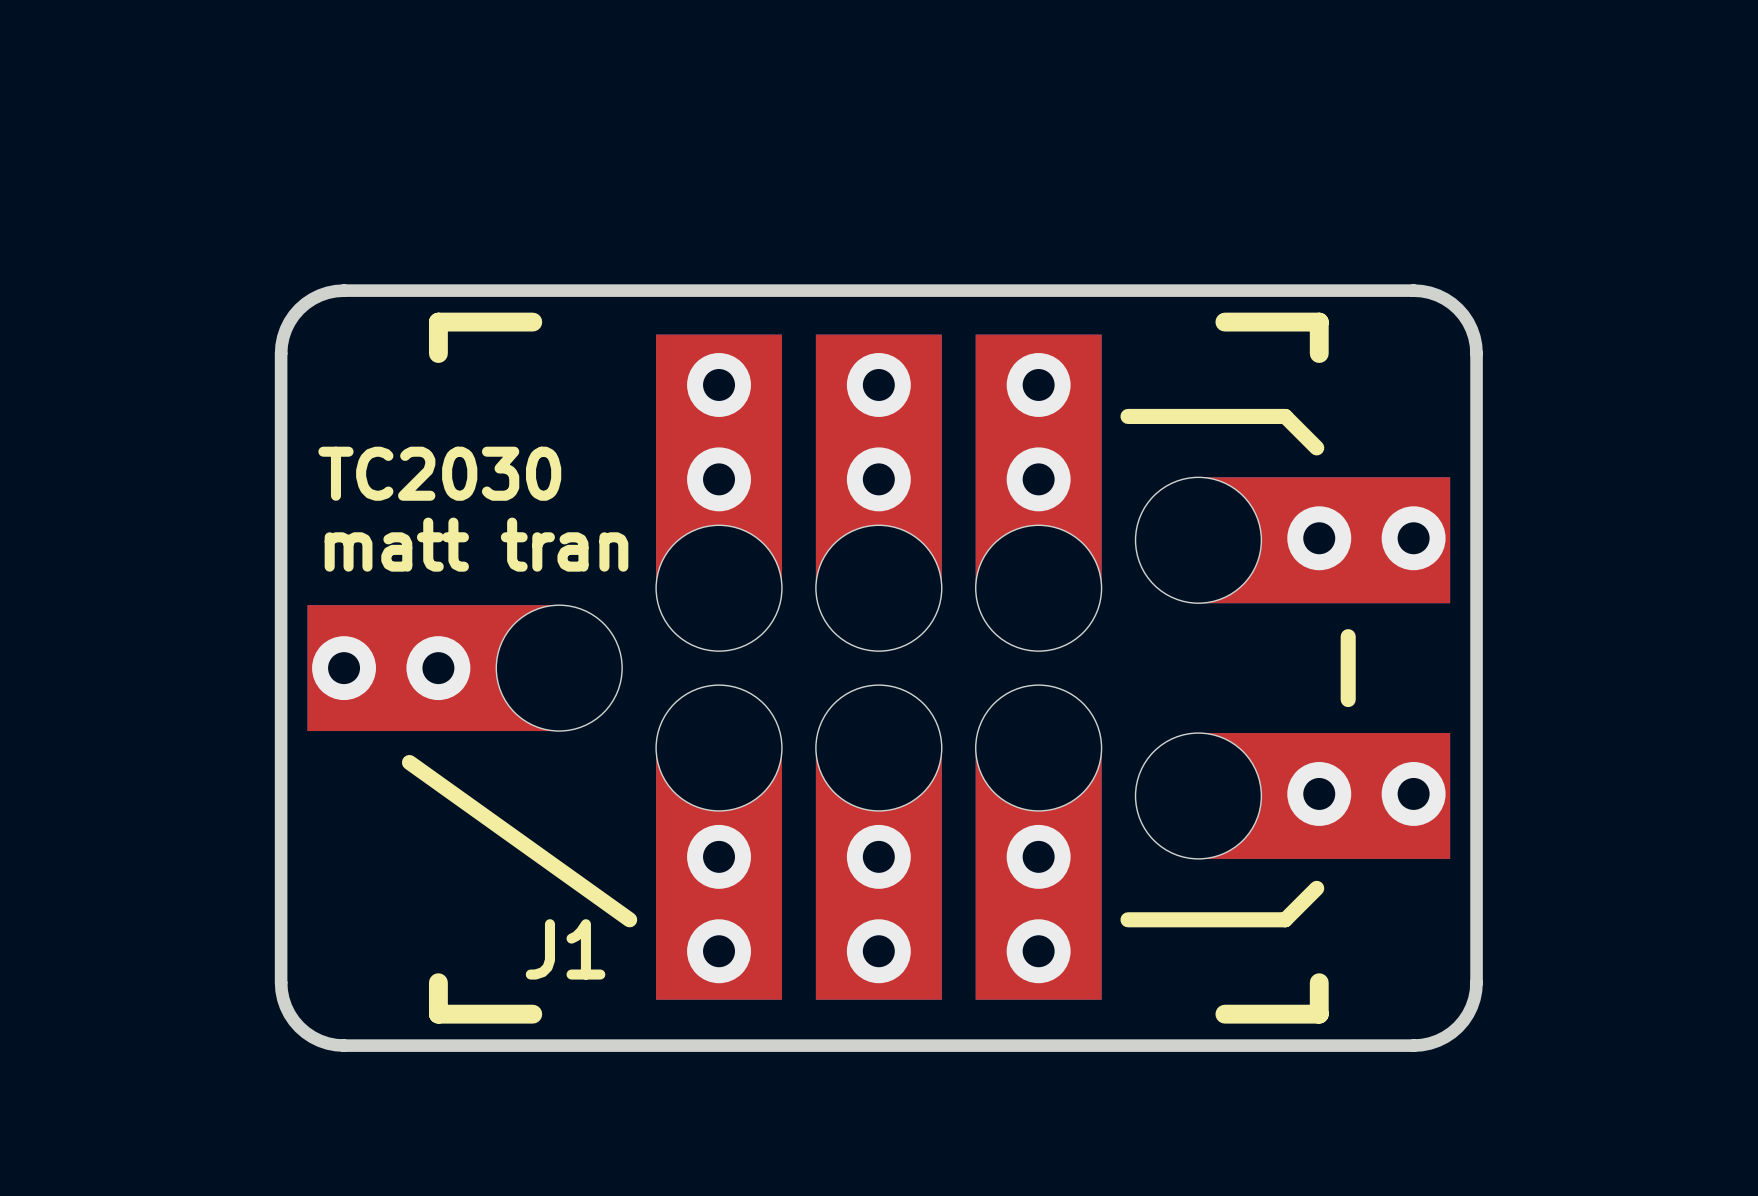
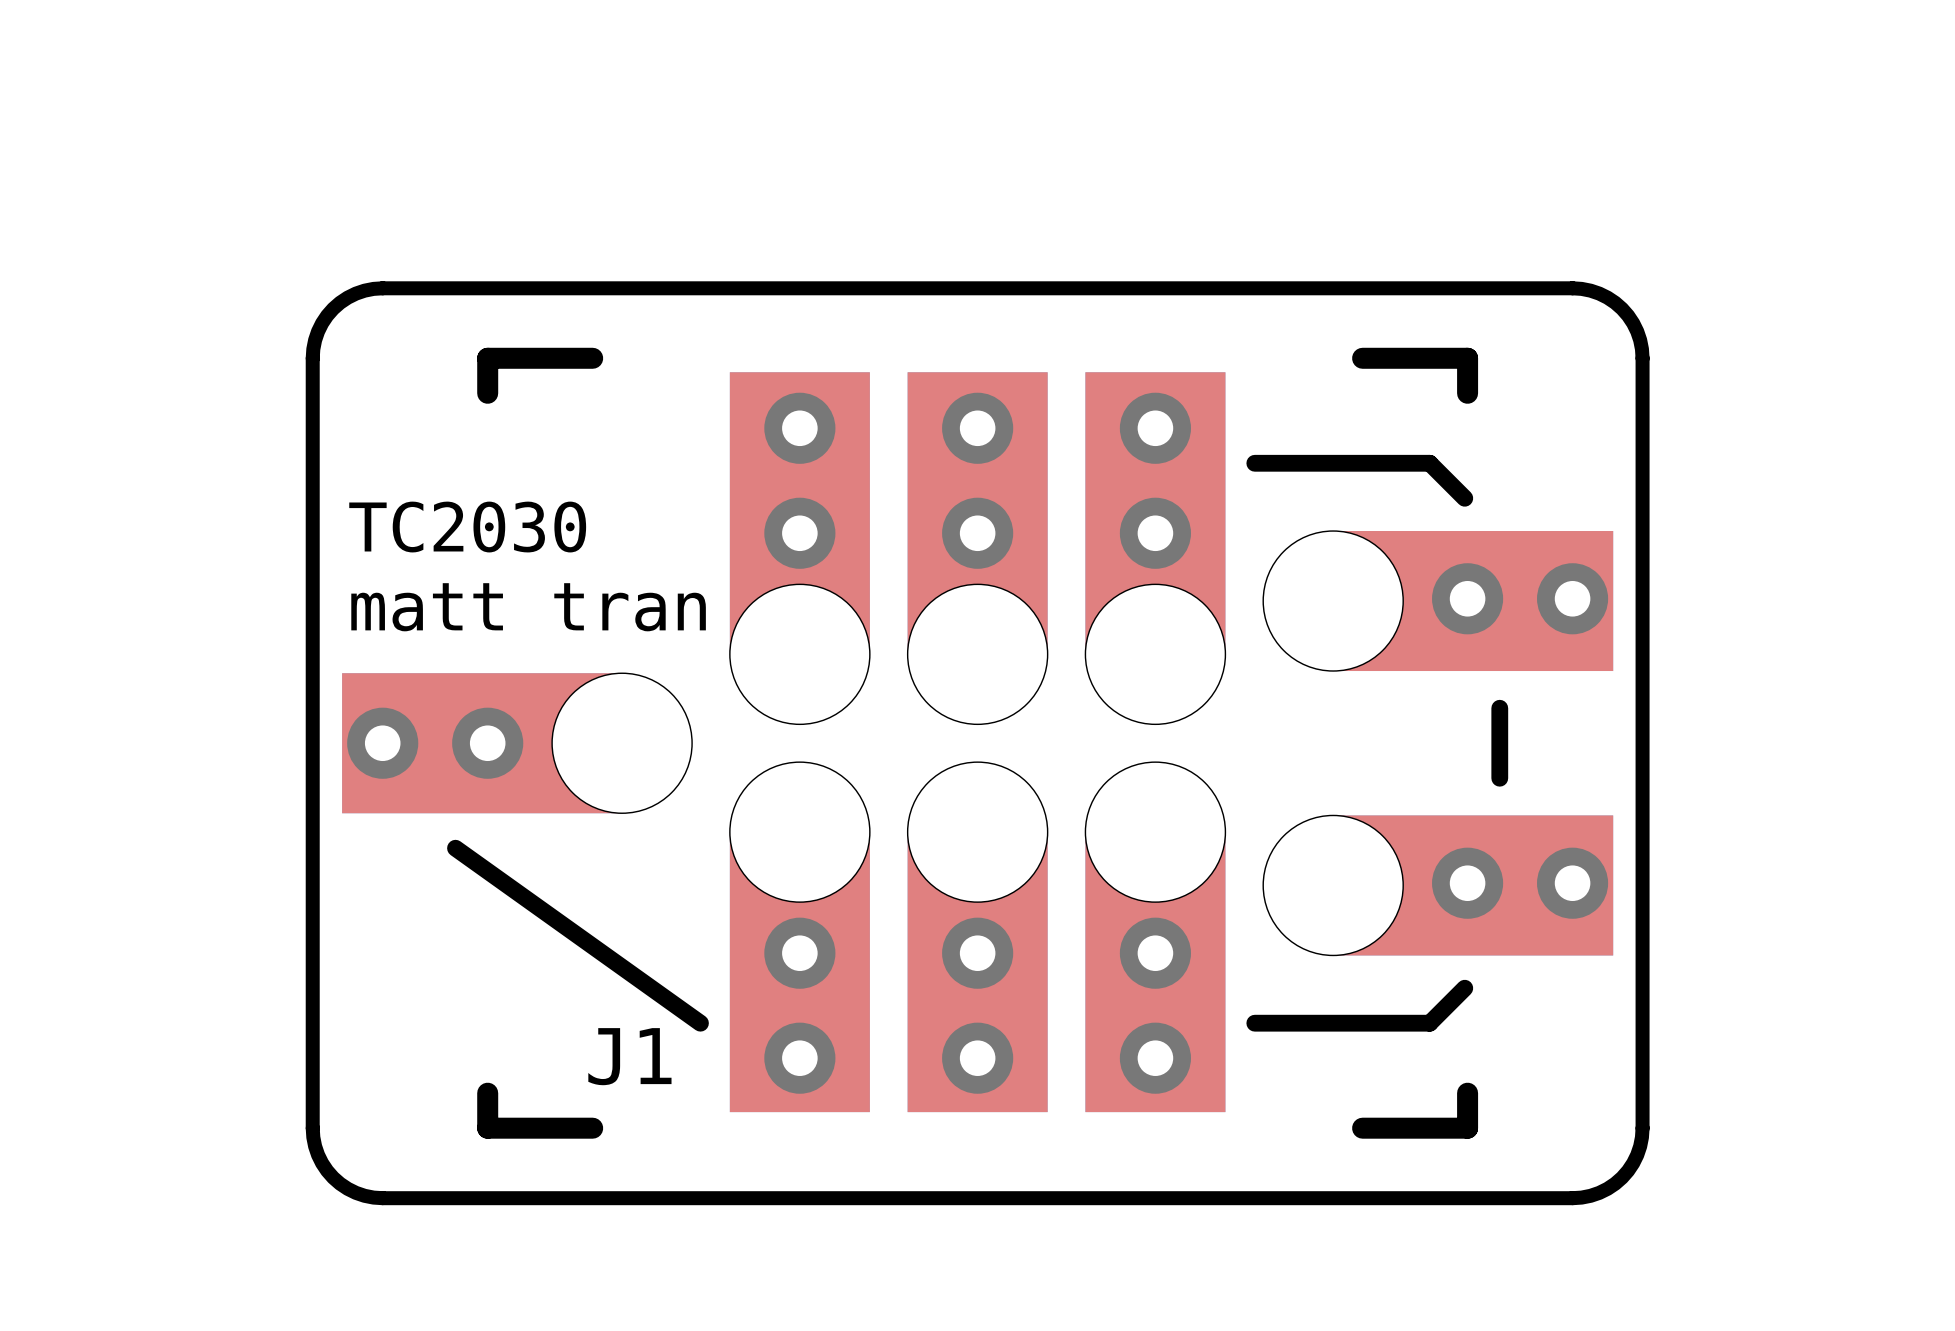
board edge: (281, 353) (285, 329) (299, 309) (319, 295) (344, 290) (1413, 290) (1437, 295) (1458, 309) (1471, 329) (1476, 353) -> (312, 393) (313, 349) (322, 323) (333, 308) (347, 297) (364, 290) (382, 288) (1581, 288) (1607, 297) (1622, 308) (1633, 323) (1641, 349) (1642, 393)
board edge: (281, 982) (285, 1006) (299, 1027) (319, 1040) (344, 1045) (1413, 1045) (1437, 1040) (1458, 1027) (1471, 1006) (1476, 982) -> (312, 1093) (313, 1137) (322, 1163) (333, 1177) (347, 1188) (364, 1195) (382, 1198) (1581, 1197) (1599, 1192) (1615, 1183) (1633, 1163) (1641, 1137) (1642, 1093)

